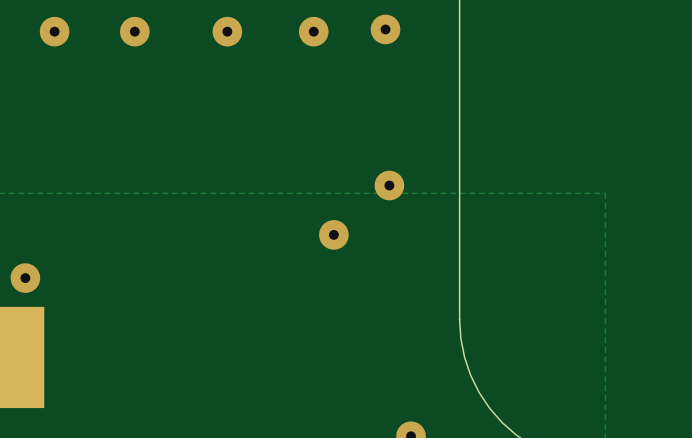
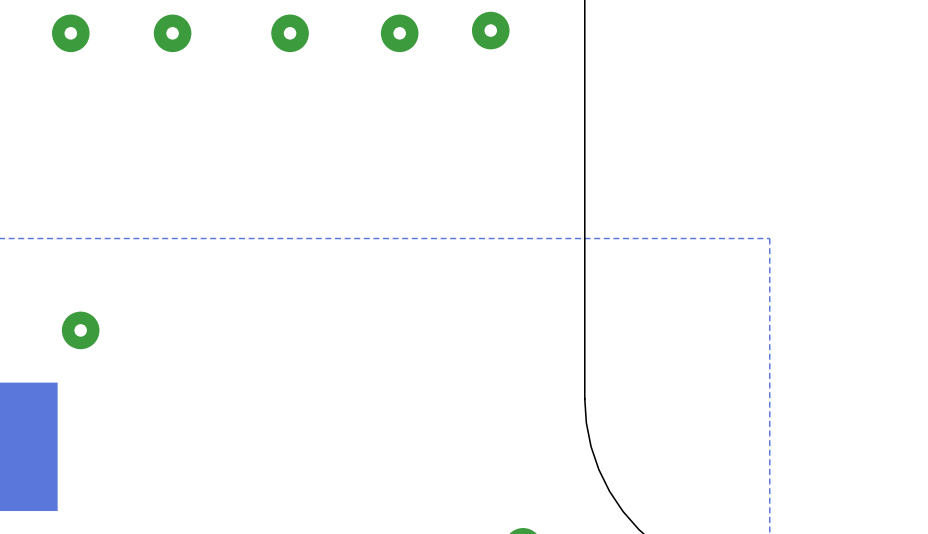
via: (389, 185) -> none
via: (333, 234) -> none
via position: (25, 278) -> (80, 330)

